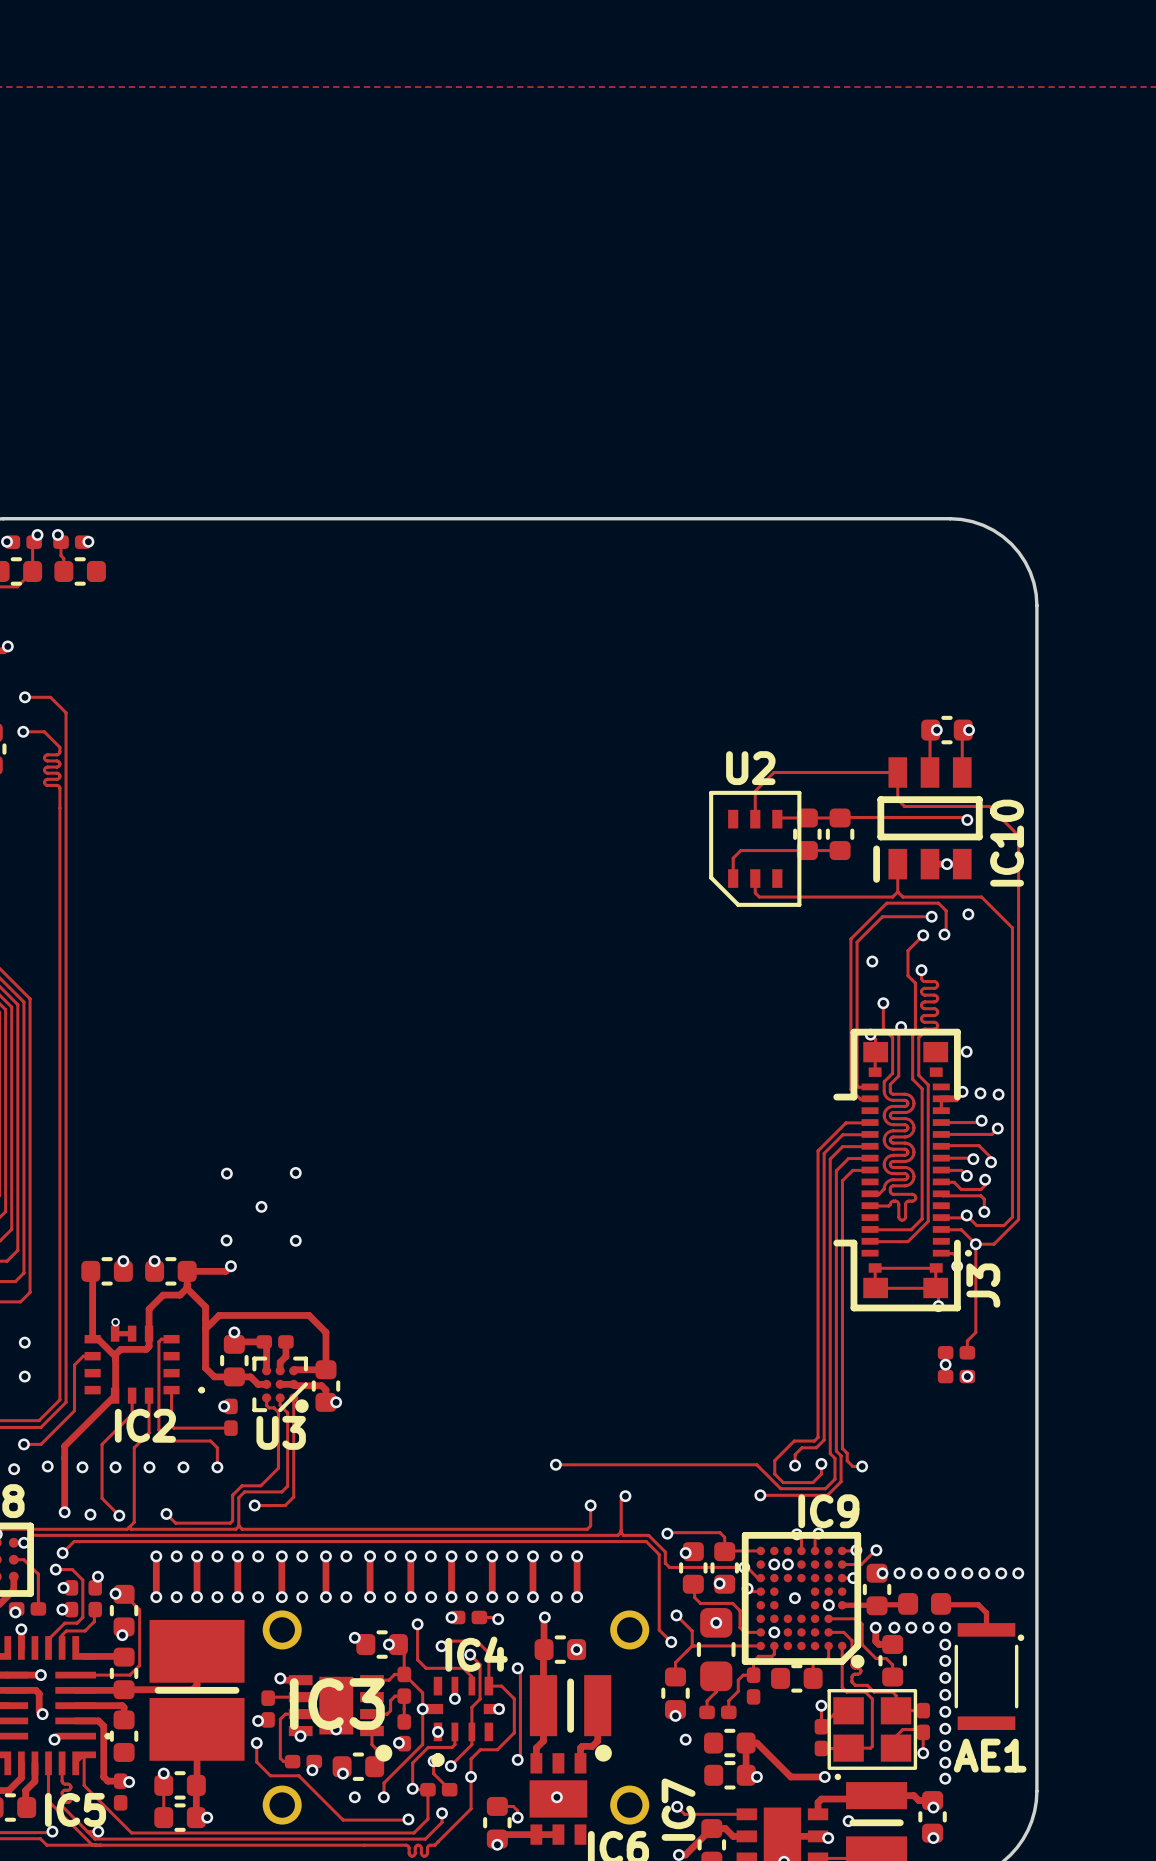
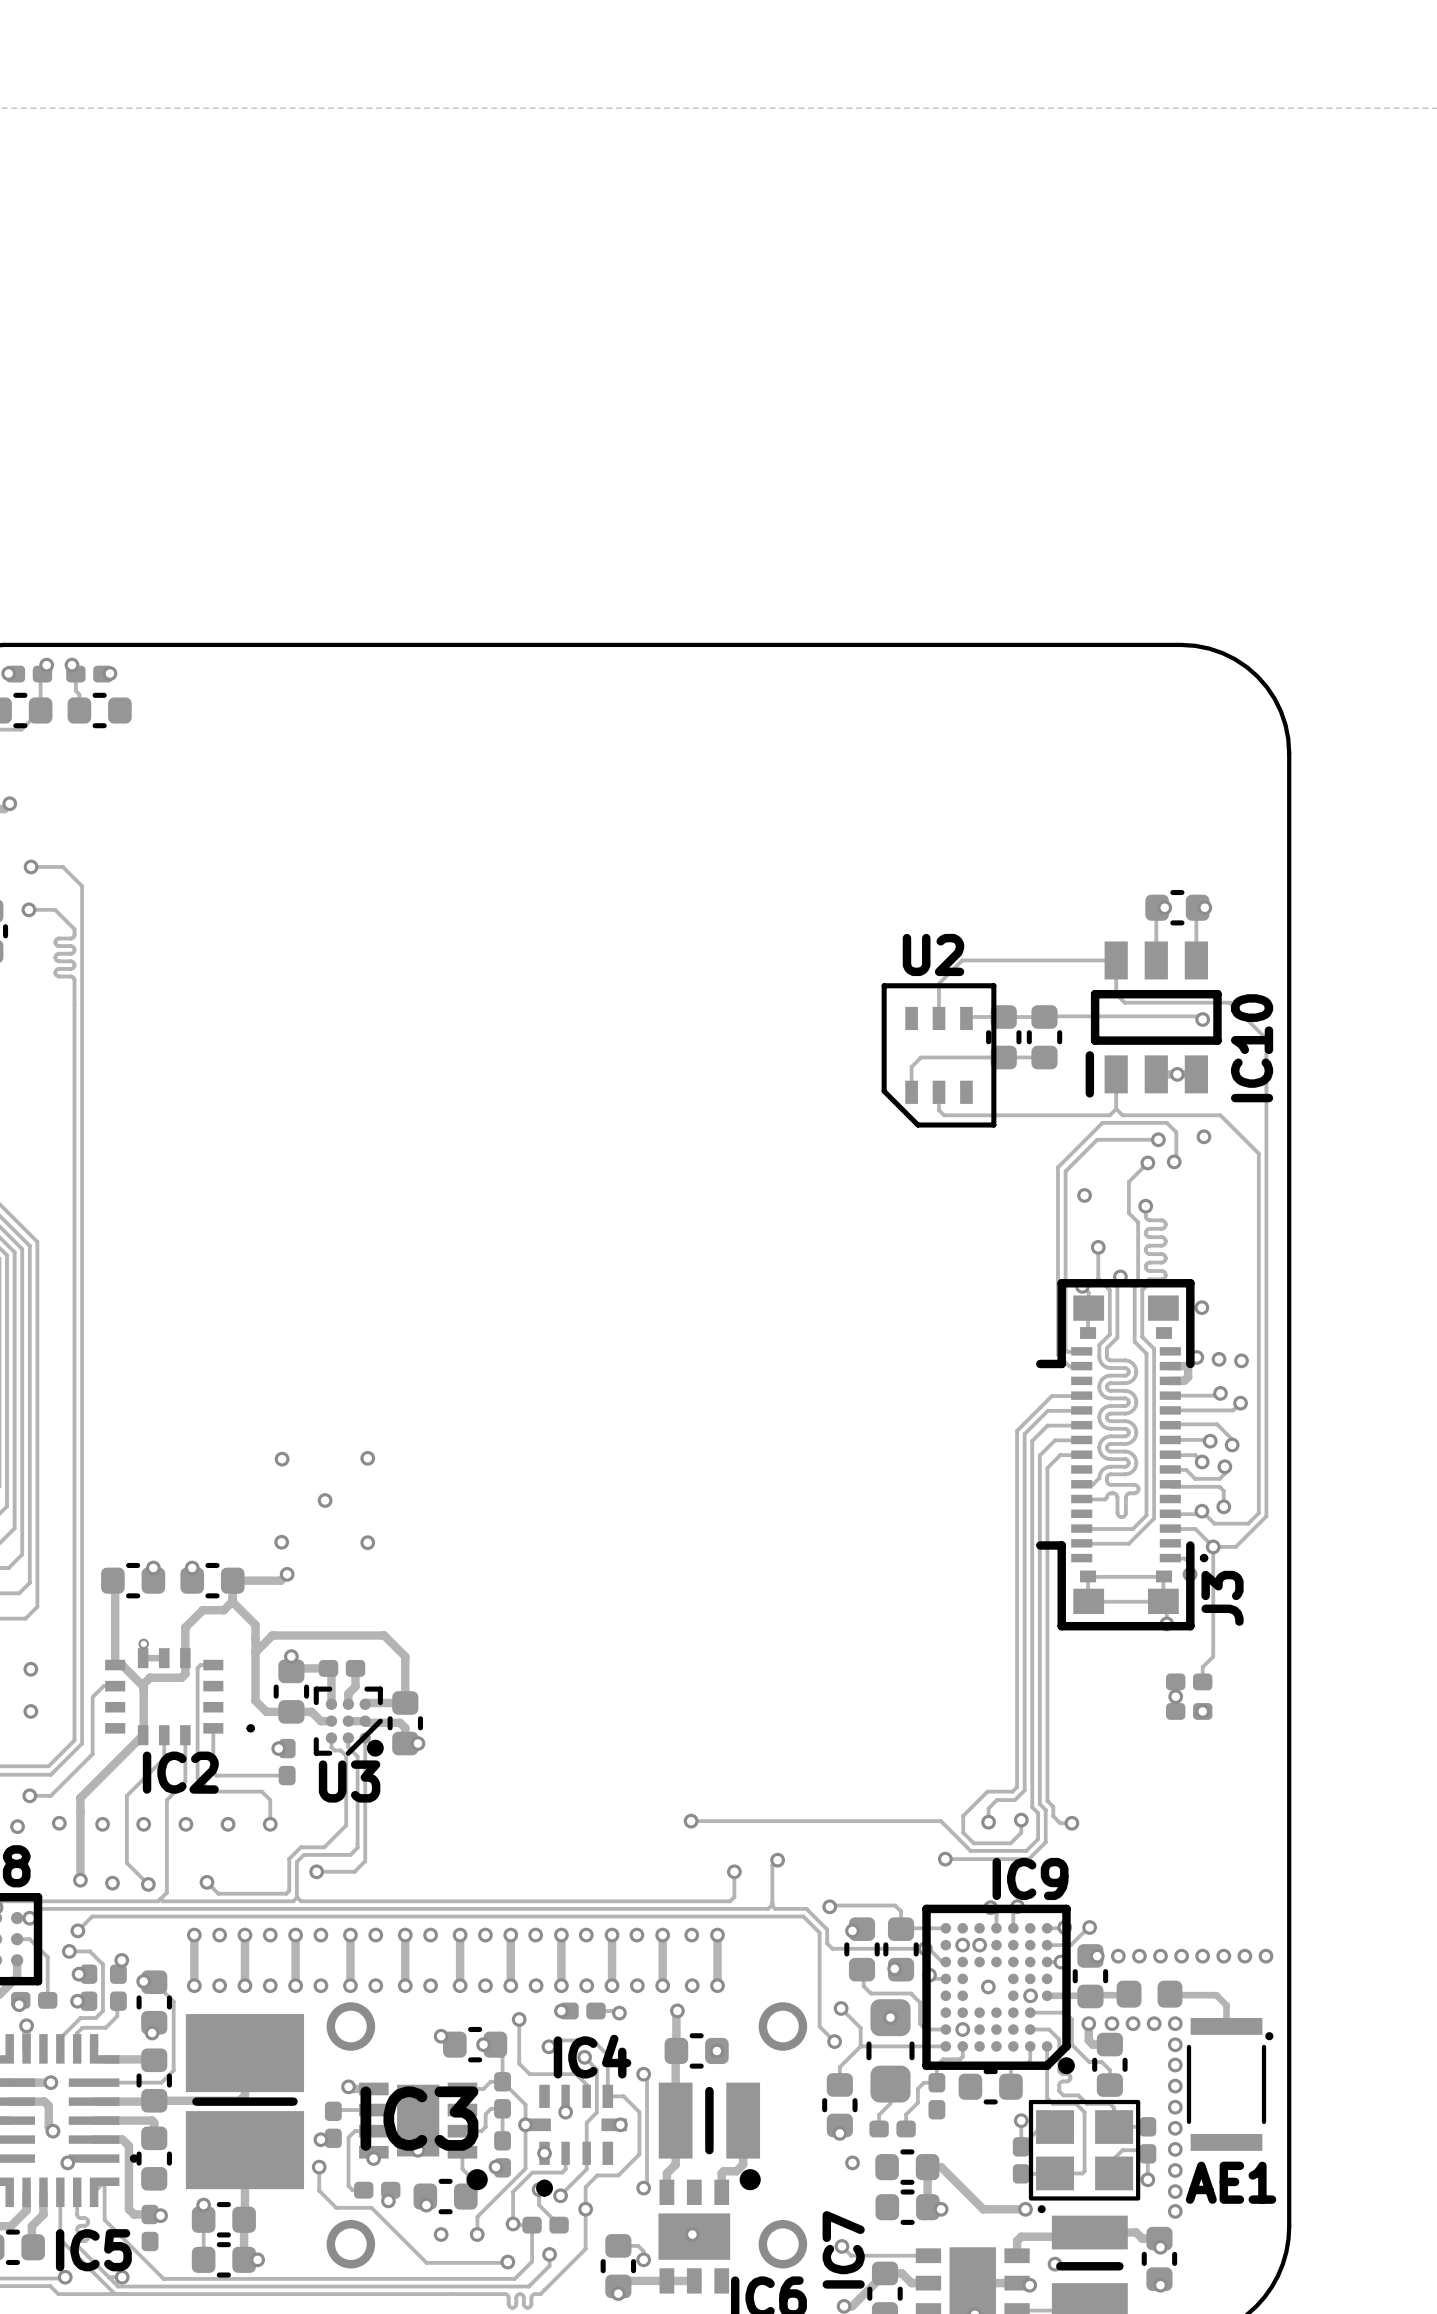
track: (941, 1099) (941, 1111) -> (1188, 1366) (1188, 1376) (1184, 1380) (1170, 1380)

